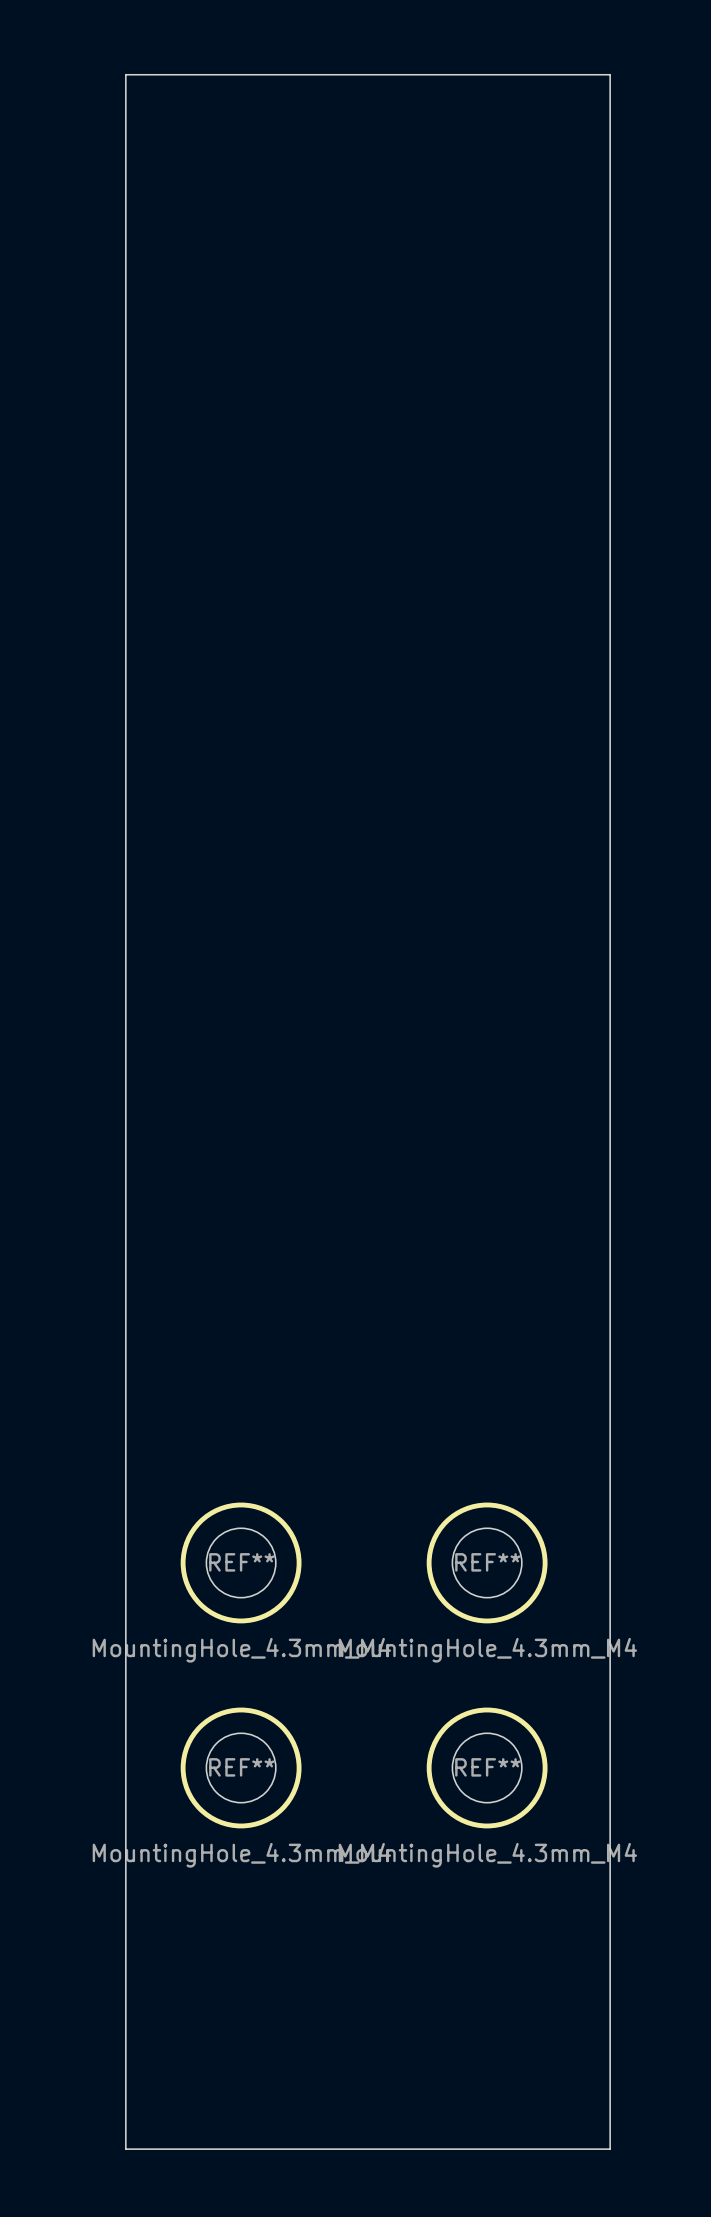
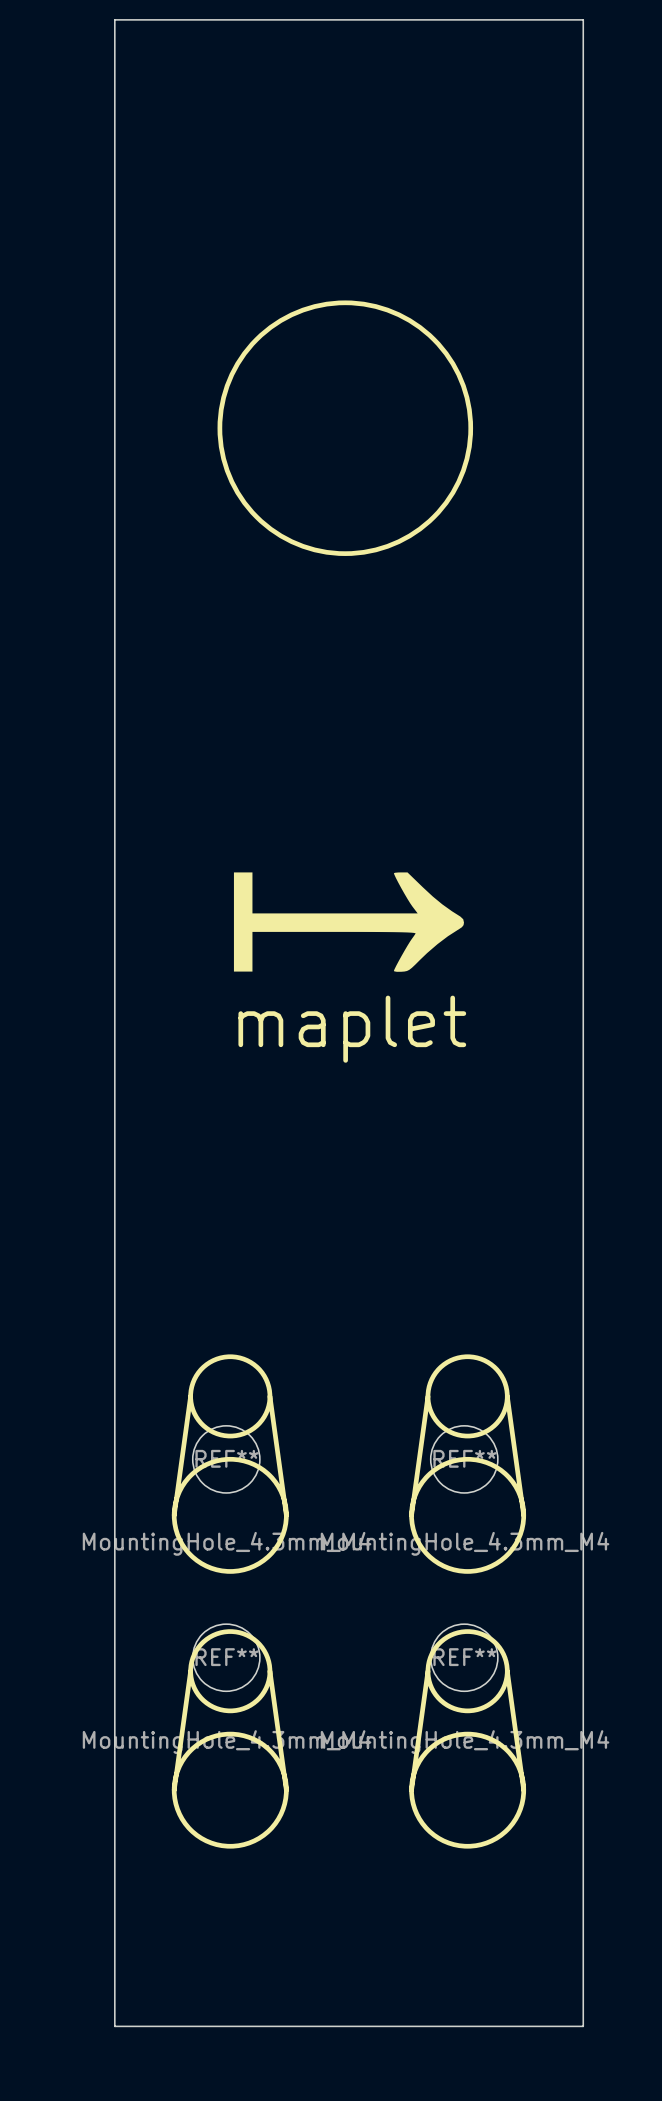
drawing: none -> [217, 300, 474, 556]
drawing: none -> [233, 872, 464, 972]
text: none -> maplet (352, 1029)
drawing: none -> [188, 1354, 273, 1439]
drawing: none -> [425, 1354, 510, 1439]
line: none -> (190, 1396) (174, 1515)
line: none -> (269, 1396) (286, 1515)
line: none -> (427, 1396) (411, 1515)
line: none -> (507, 1396) (523, 1515)
drawing position: (241, 1562) -> (230, 1515)
drawing position: (487, 1562) -> (467, 1515)
drawing shape: [180, 1707, 302, 1829] -> [188, 1629, 273, 1714]
drawing shape: [426, 1707, 548, 1829] -> [425, 1629, 510, 1714]
line: none -> (190, 1671) (174, 1790)
line: none -> (269, 1671) (286, 1790)
line: none -> (427, 1671) (411, 1790)
line: none -> (507, 1671) (523, 1790)
drawing: none -> [171, 1731, 289, 1849]
drawing: none -> [409, 1731, 527, 1849]

